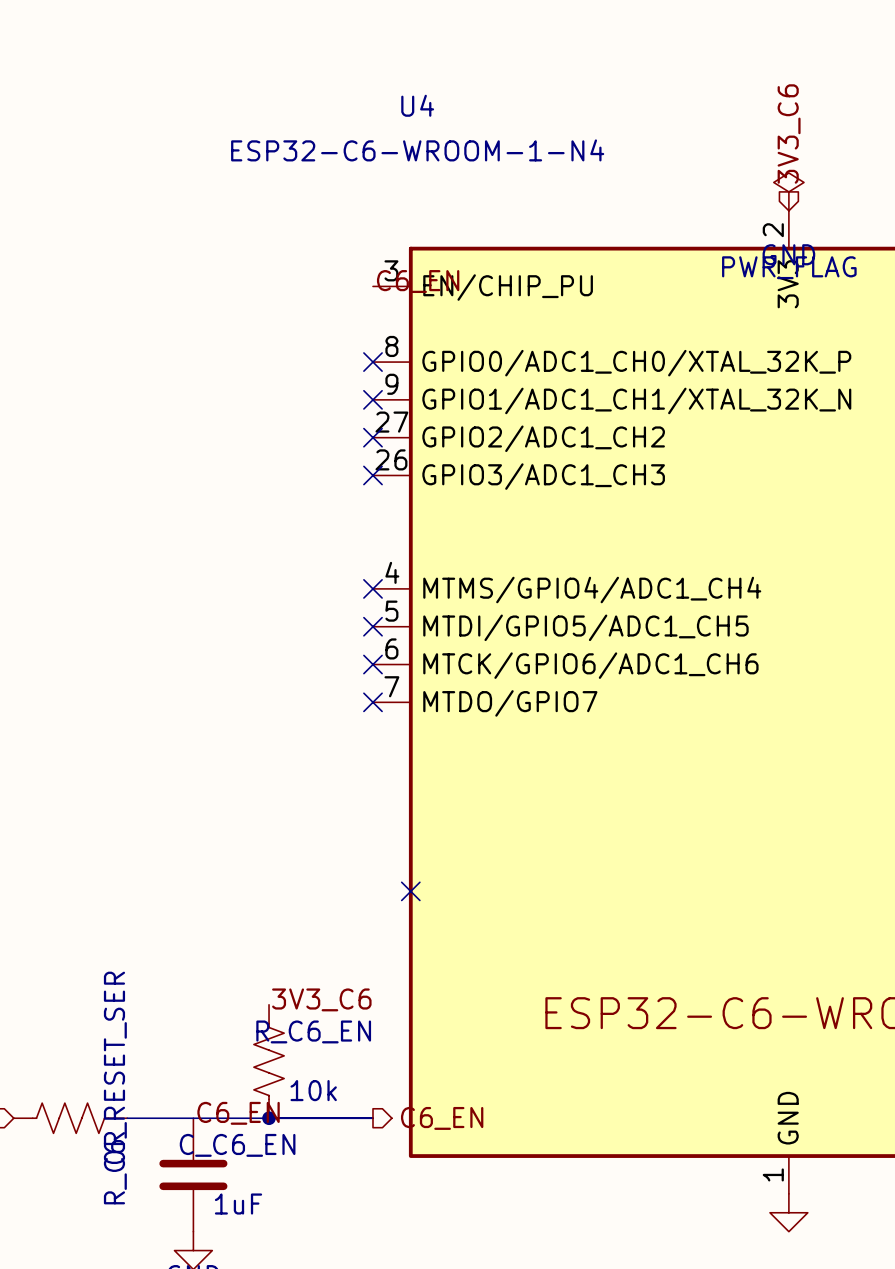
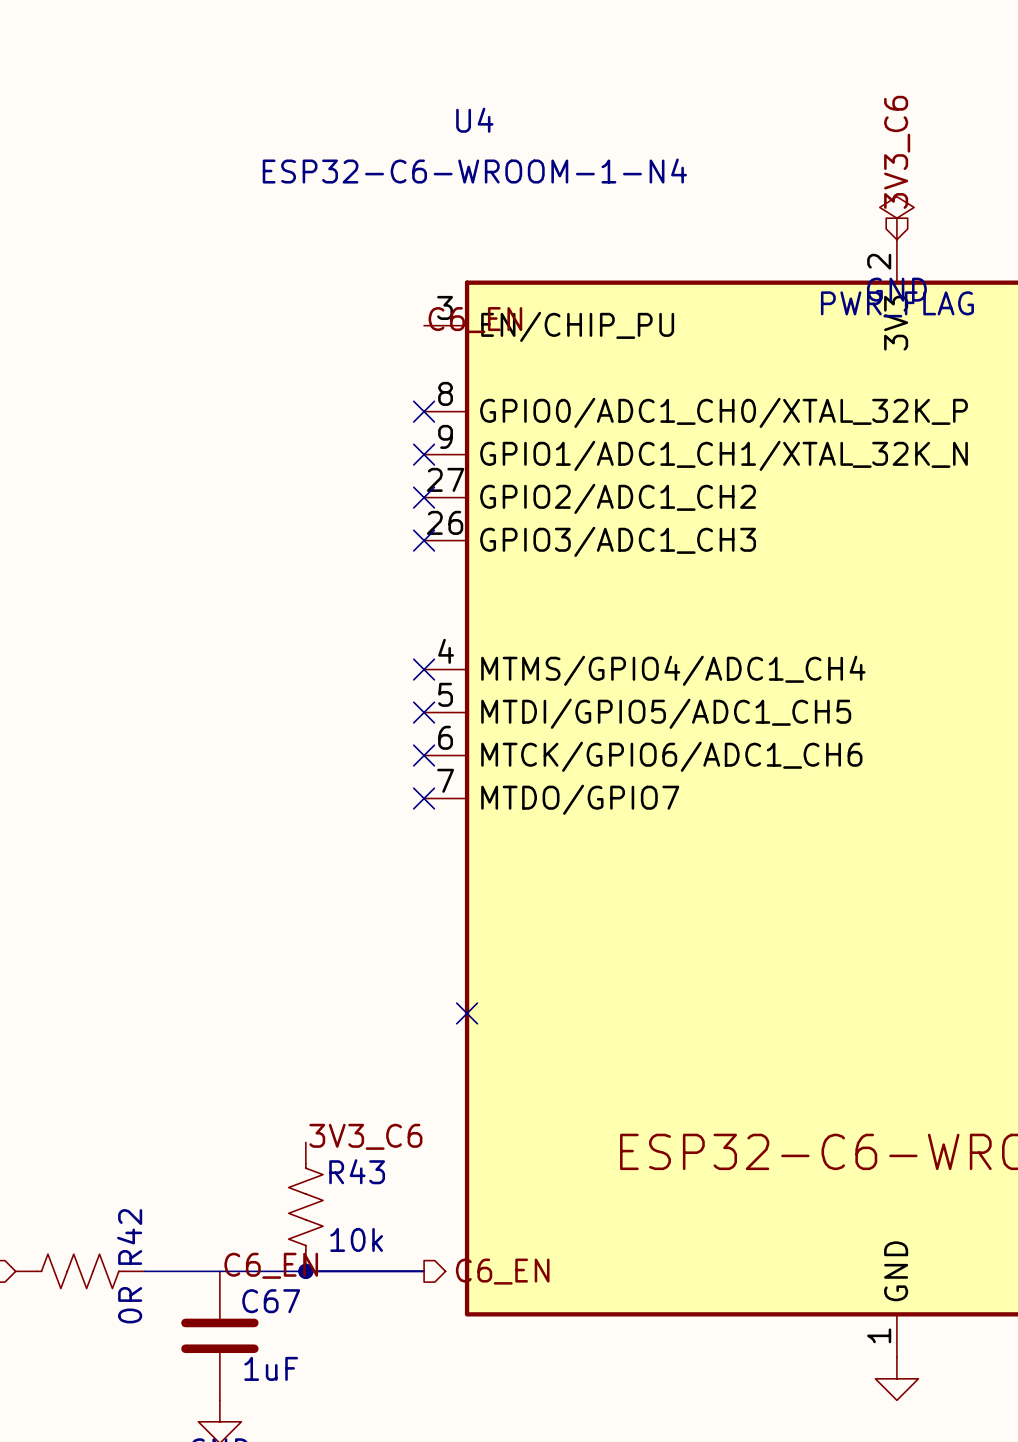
R_C6_EN name: R_C6_EN (313, 1031) -> R43 (357, 1171)
R_C6_RESET_SER name: R_C6_RESET_SER (115, 1088) -> R42 (129, 1237)
C_C6_EN name: C_C6_EN (237, 1145) -> C67 (271, 1301)

